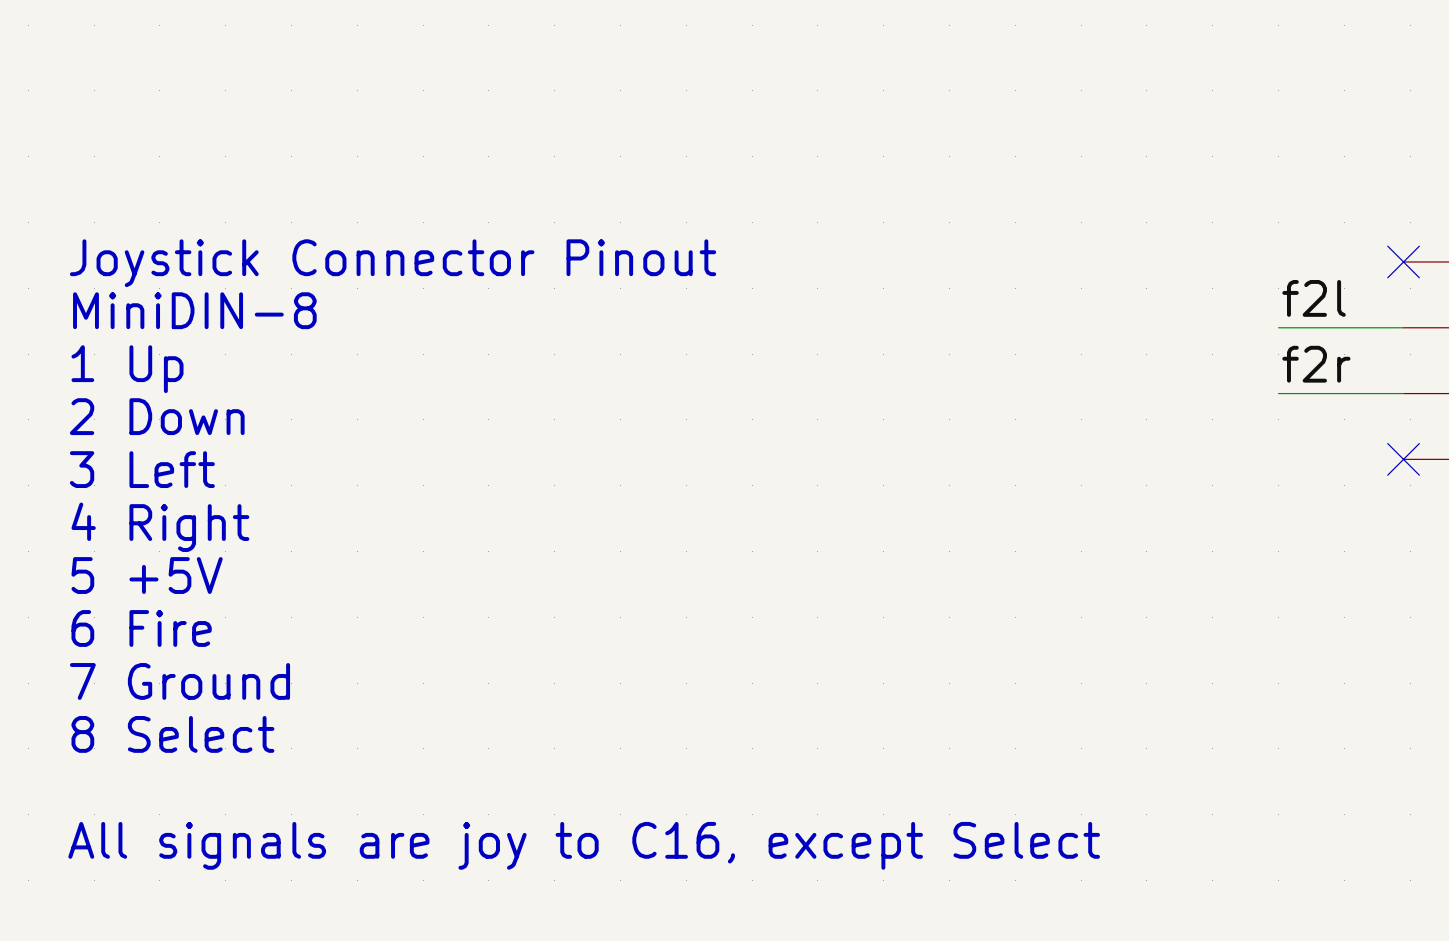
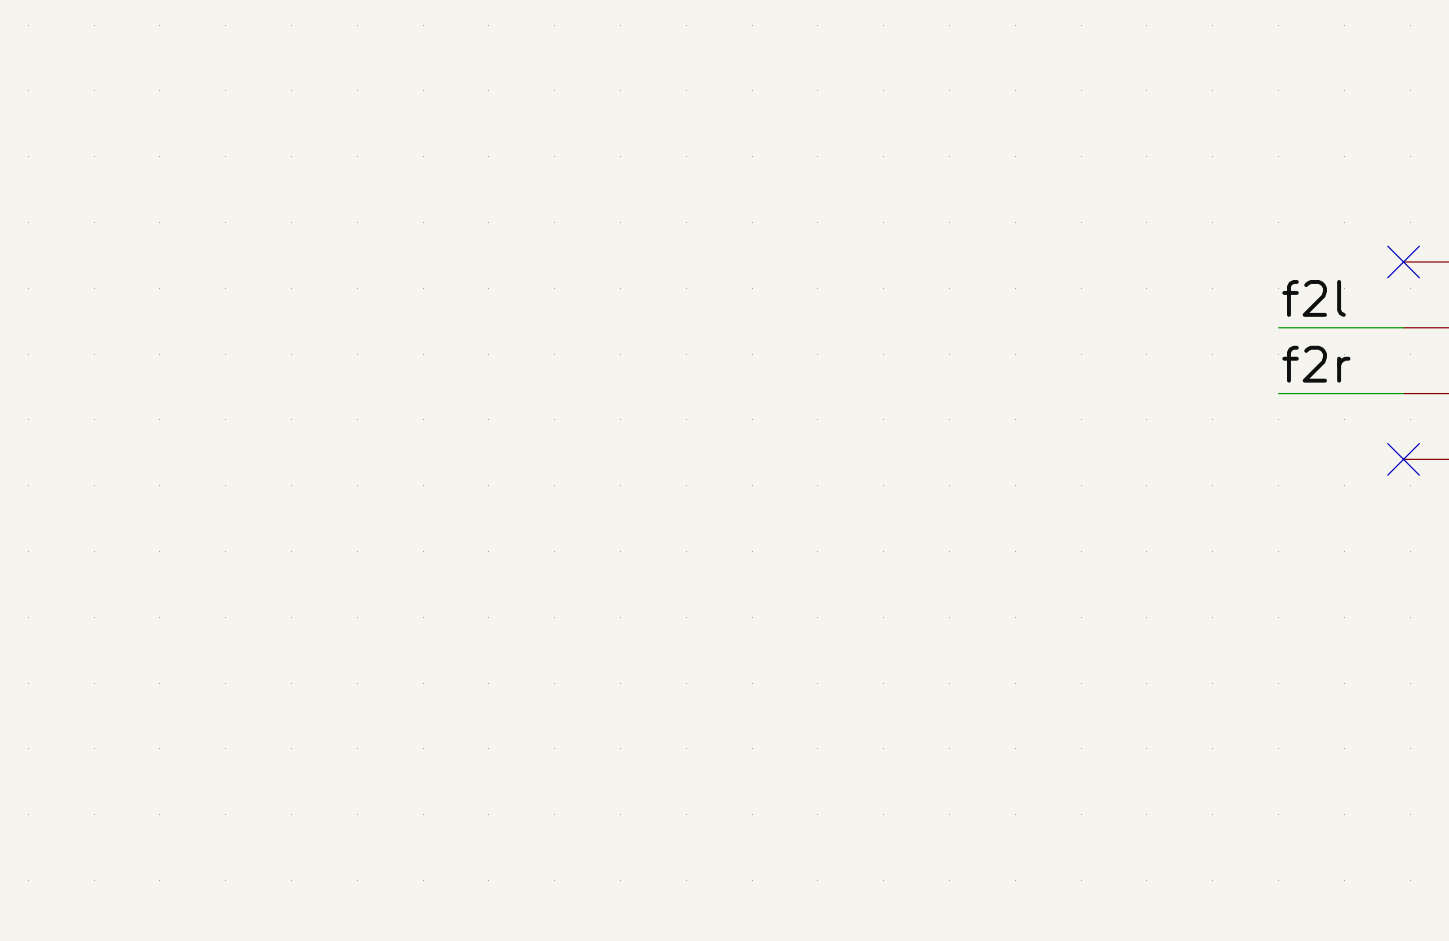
text: Joystick Connector Pinout (393, 263) -> none
text: MiniDIN-8 (194, 310) -> none
text: 1 Up (127, 369) -> none
text: 2 Down (157, 416) -> none
text: 3 Left (142, 469) -> none
text: 4 Right (160, 527) -> none
text: 5 +5V (147, 575) -> none
text: 6 Fire (141, 628) -> none
text: 7 Ground (179, 681) -> none
text: 8 Select (172, 734) -> none
text: All signals are joy to C16, except Select (584, 845) -> none

